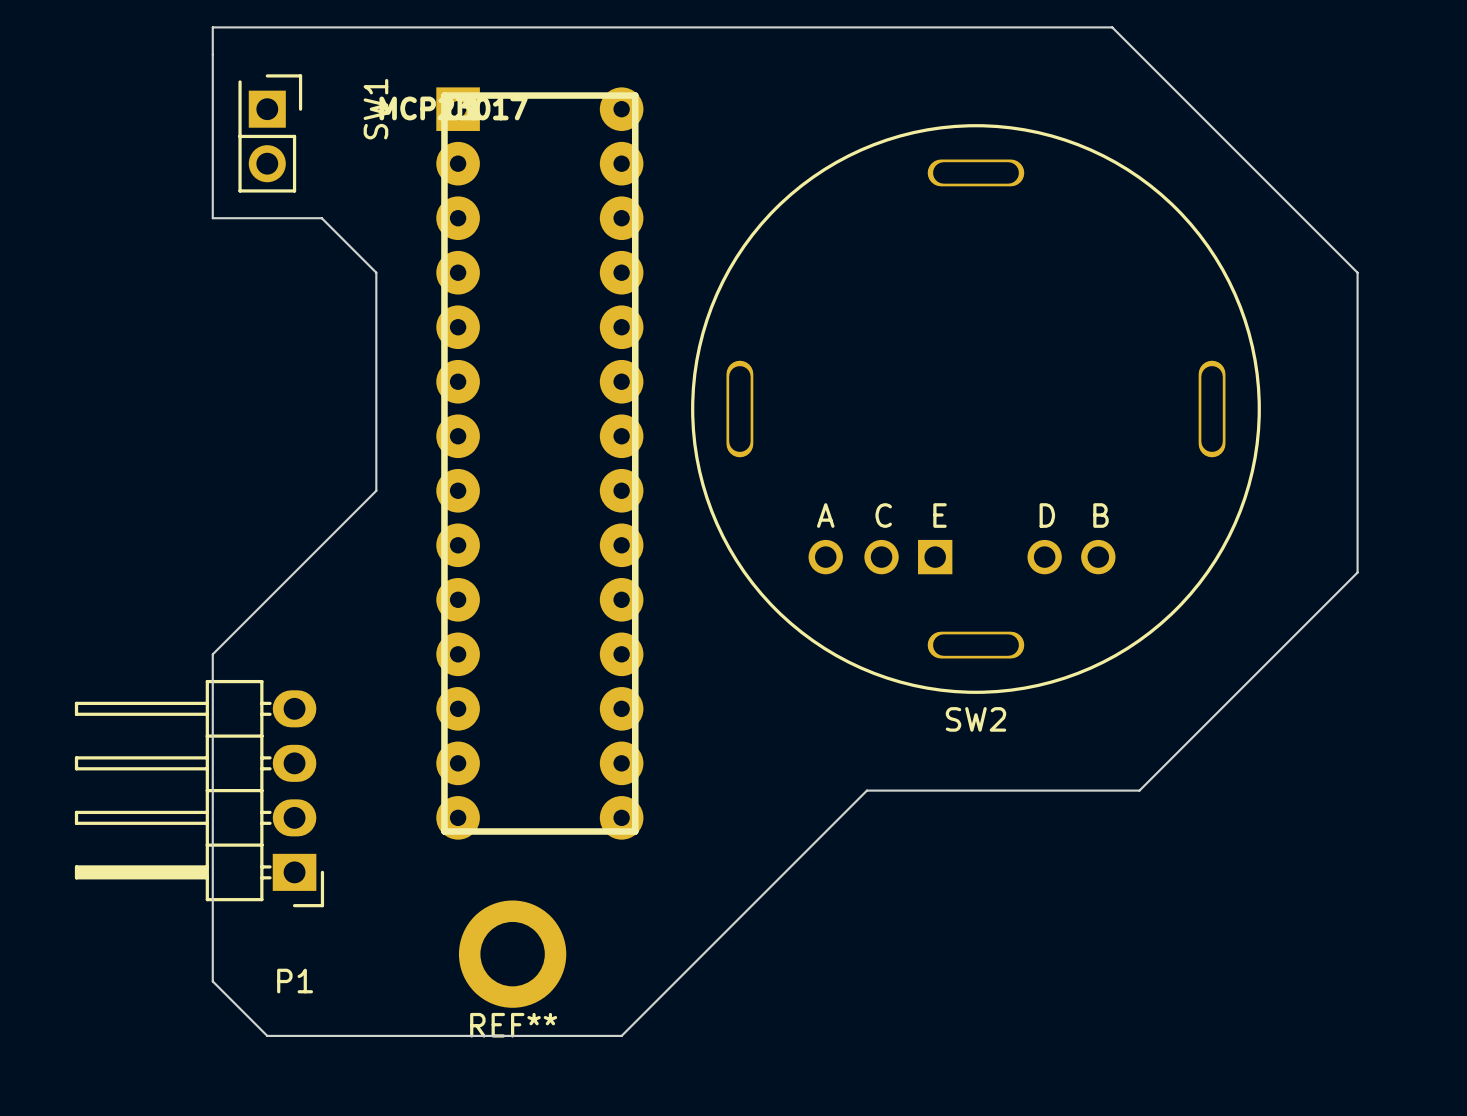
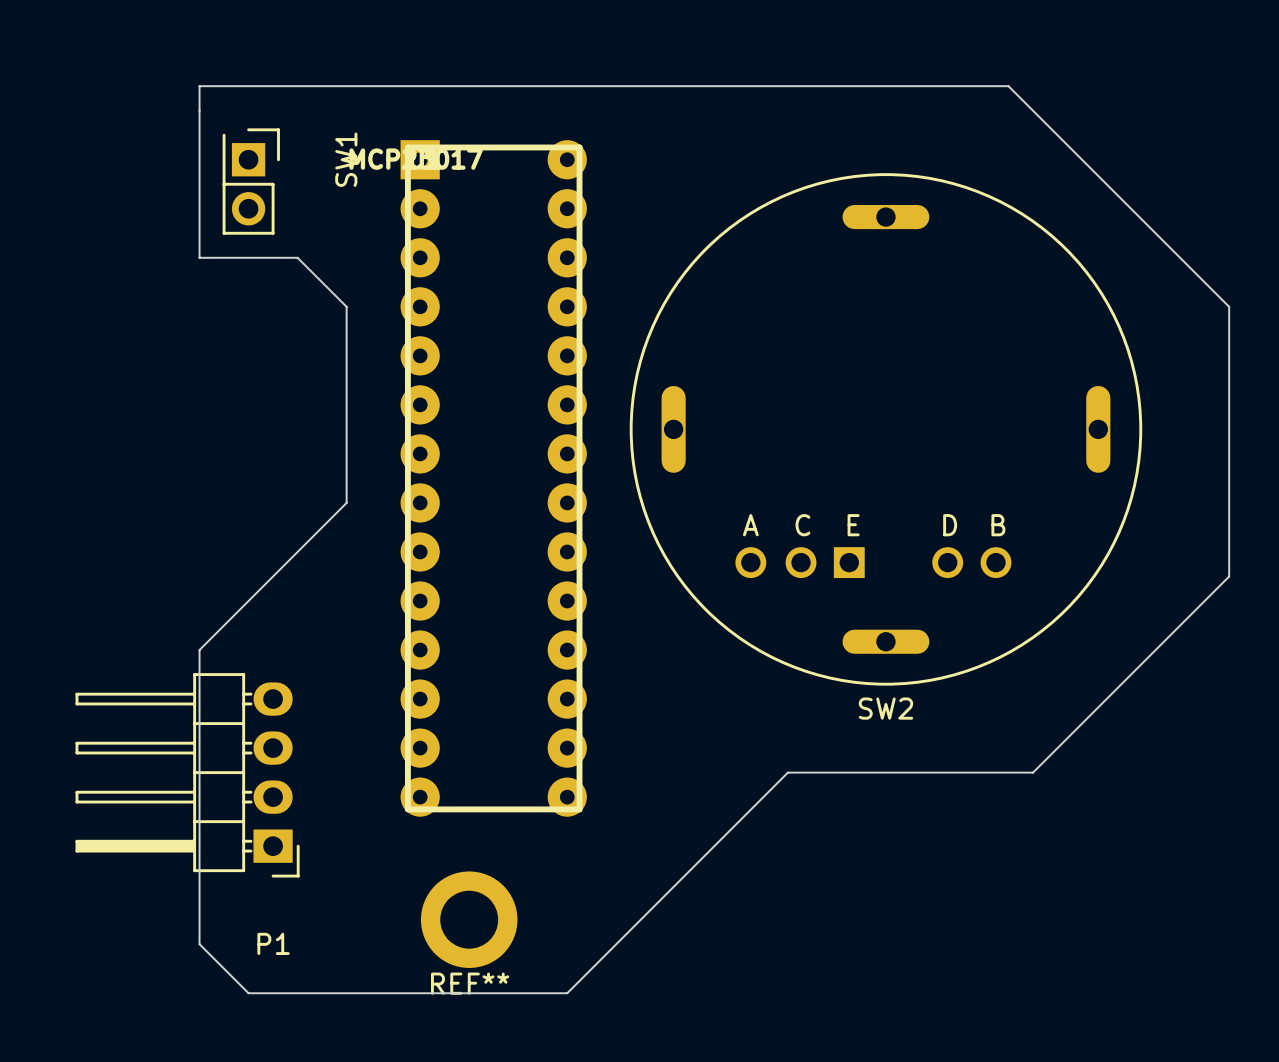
SW2 footprint: [691, 124, 1261, 694] -> [629, 173, 1143, 686]

